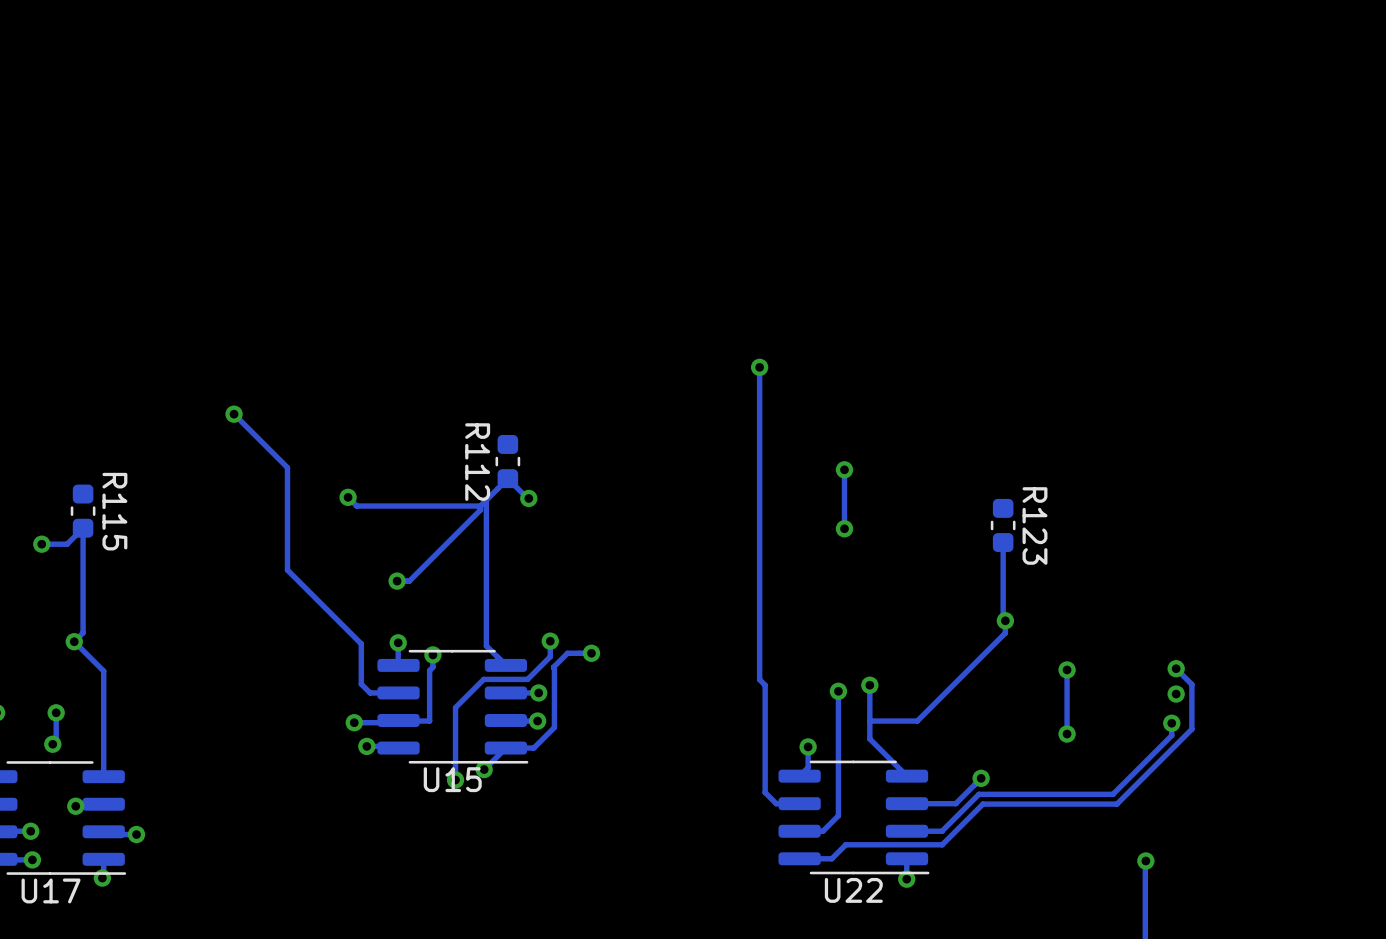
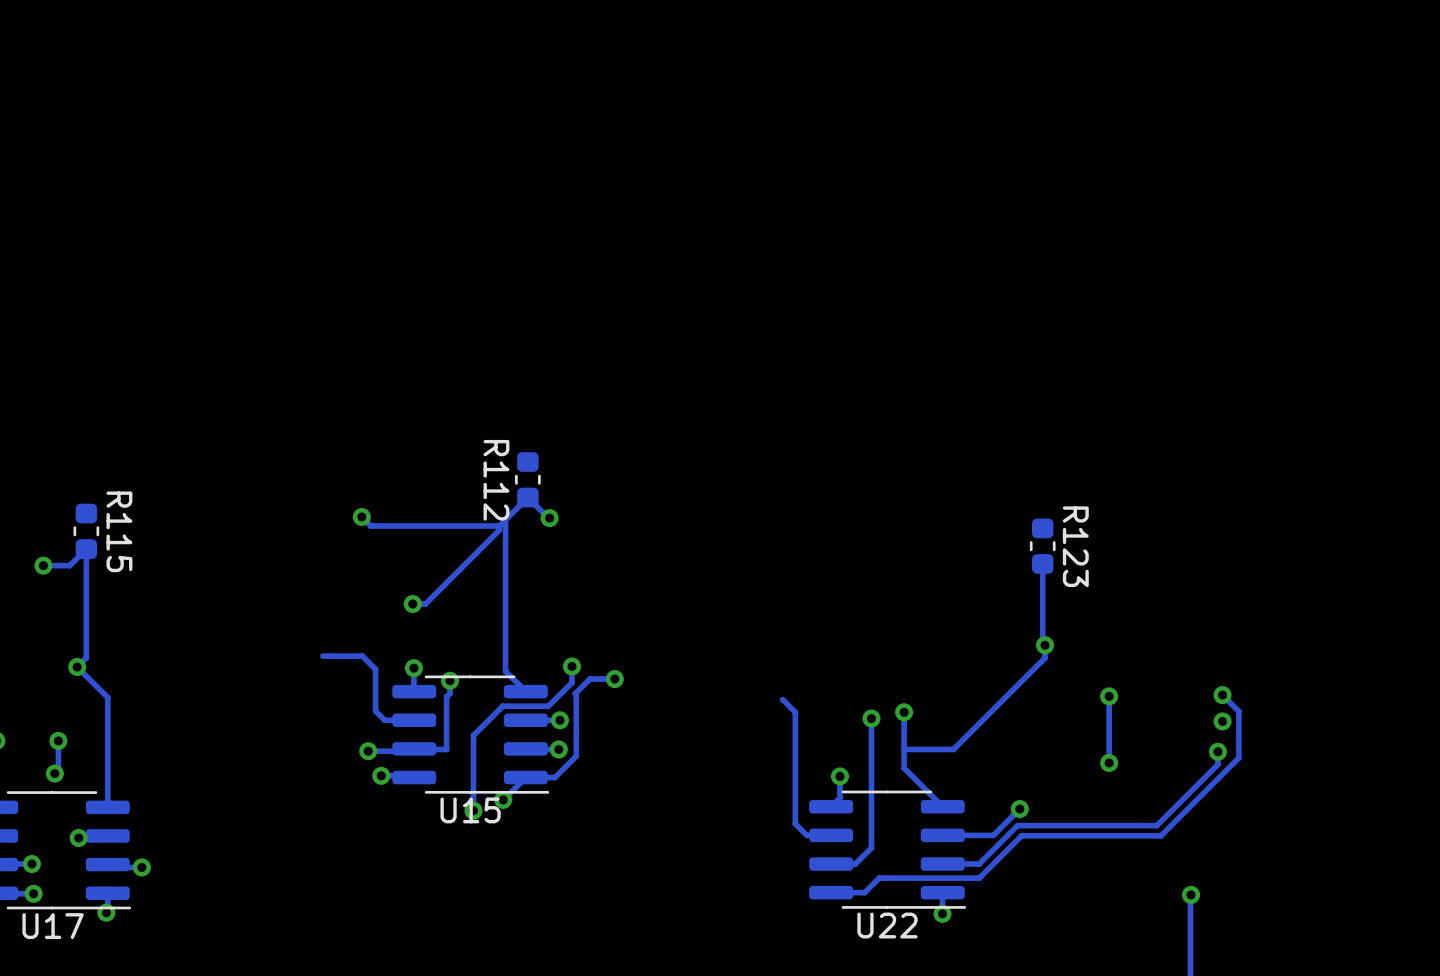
track: (759, 367) (759, 679) -> (782, 699) (789, 706)
via: (759, 367) -> none
track: (234, 414) (287, 467) (287, 570) (348, 631) -> (322, 656) (362, 656)
via: (234, 414) -> none
track: (844, 469) (844, 528) -> none
via: (844, 469) -> none
via: (844, 528) -> none

